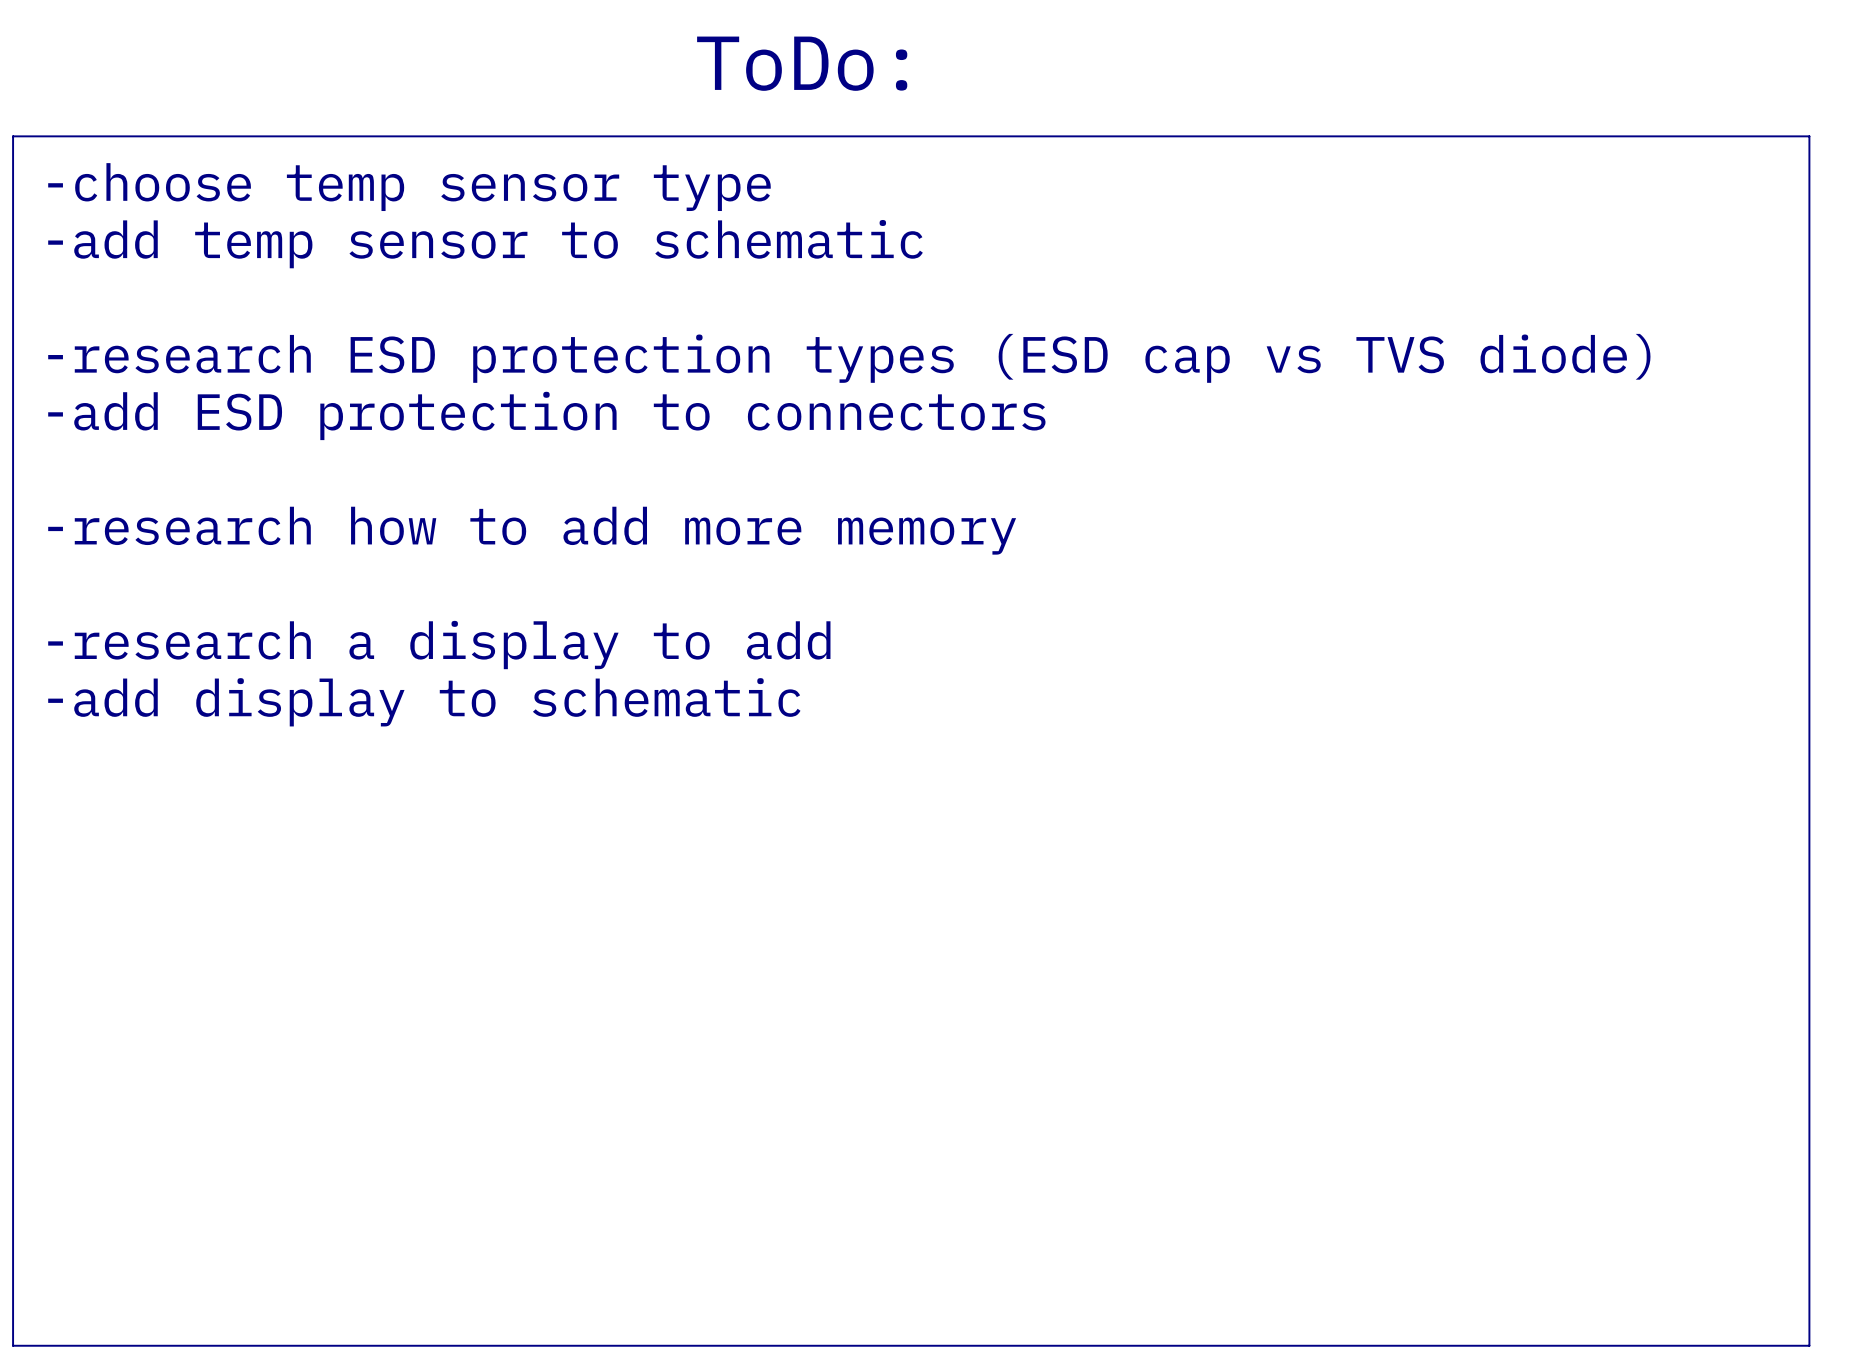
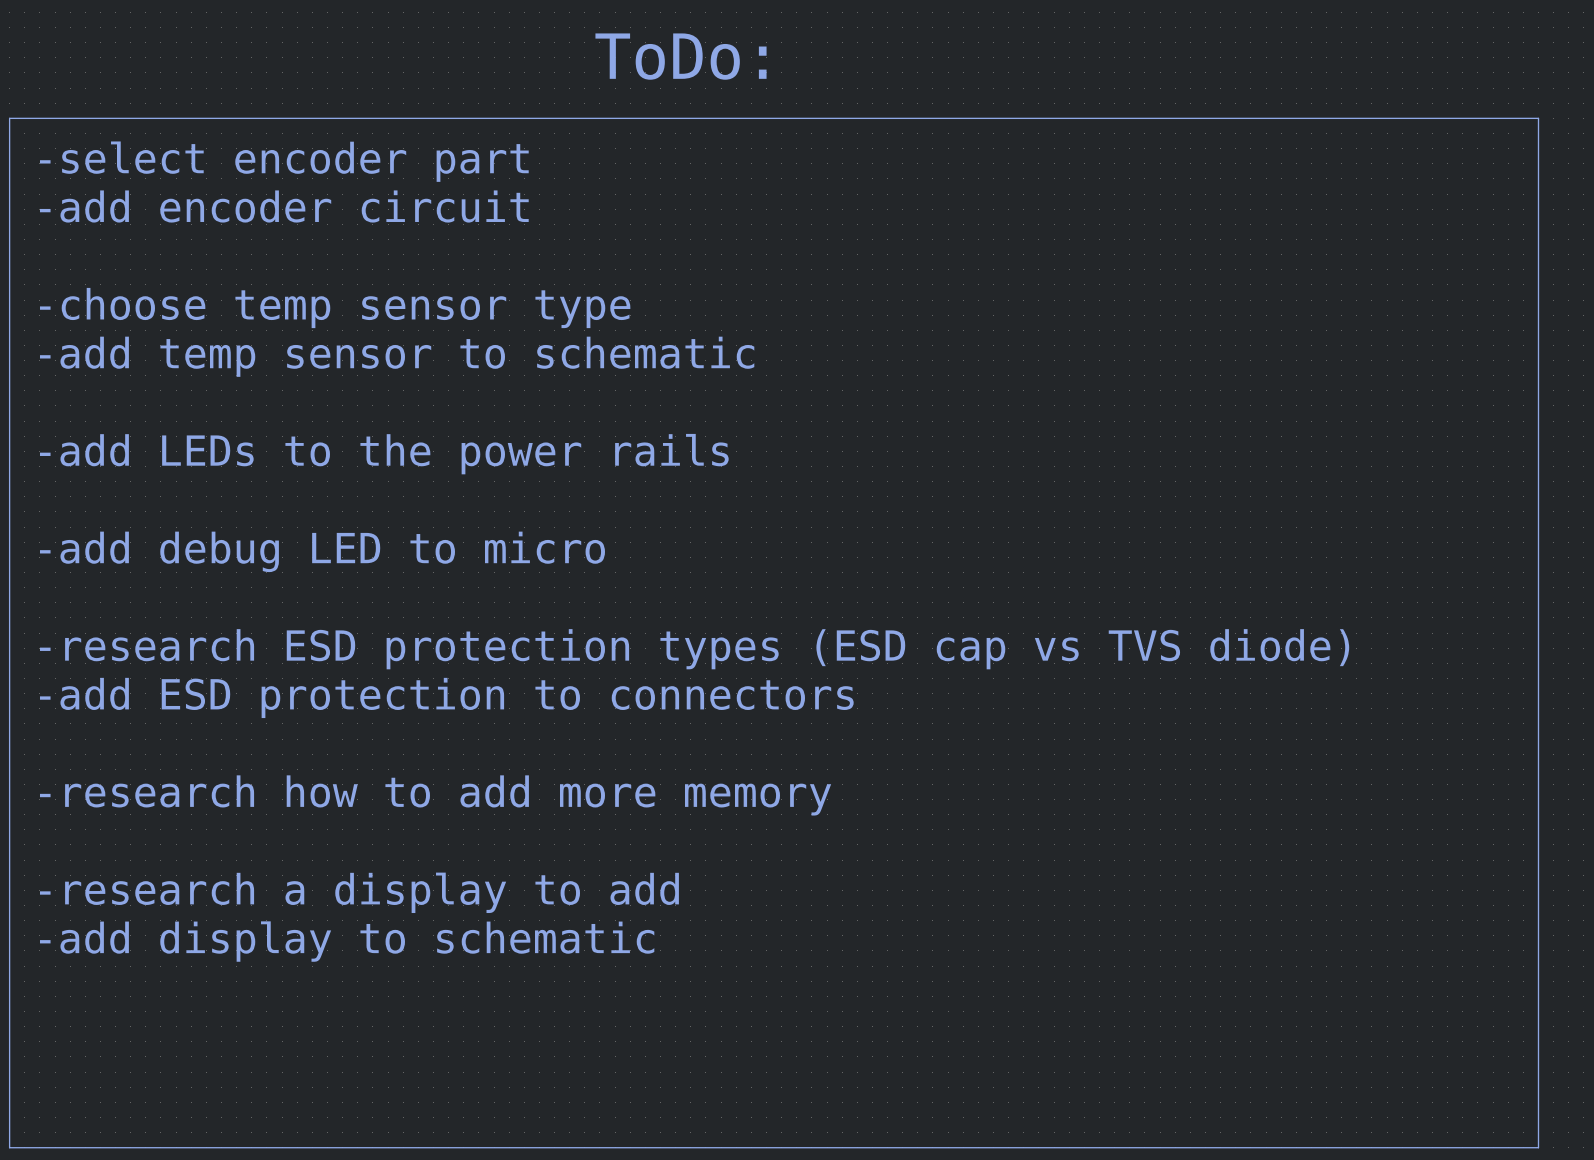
text: -choose temp sensor type (409, 187) -> -select encoder part (284, 161)
text: -add temp sensor to schematic (485, 244) -> -add encoder circuit (284, 206)
text: -research ESD protection types (ESD cap vs TVS diode) (849, 358) -> -choose temp sensor type (335, 308)
text: -add ESD protection to connectors (546, 415) -> -add temp sensor to schematic (397, 356)
text: -research how to add more memory (532, 530) -> -add LEDs to the power rails (384, 454)
text: -research a display to add (439, 645) -> -add debug LED to micro (322, 551)
text: -add display to schematic (424, 702) -> none
text: none -> -research ESD protection types (ESD cap vs TVS diode) (694, 649)
text: none -> -add ESD protection to connectors (446, 697)
text: none -> -research how to add more memory (435, 795)
text: none -> -research a display to add (359, 892)
text: none -> -add display to schematic (347, 941)

